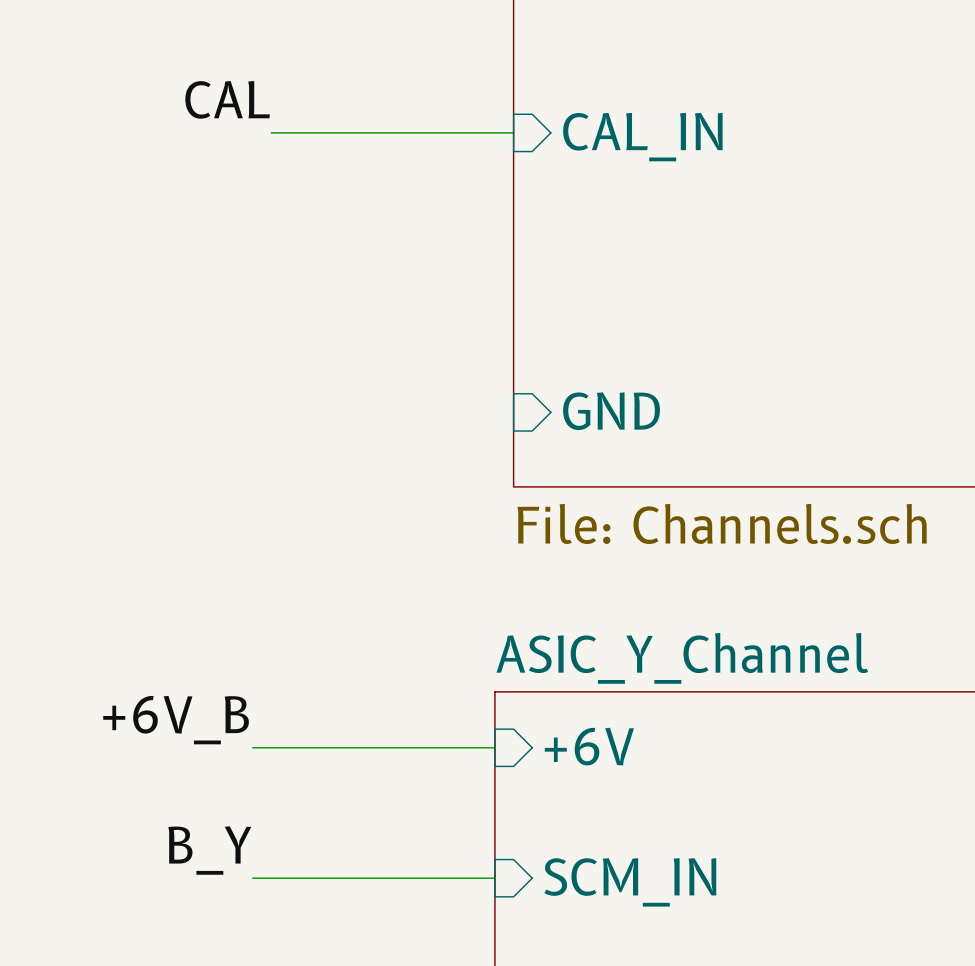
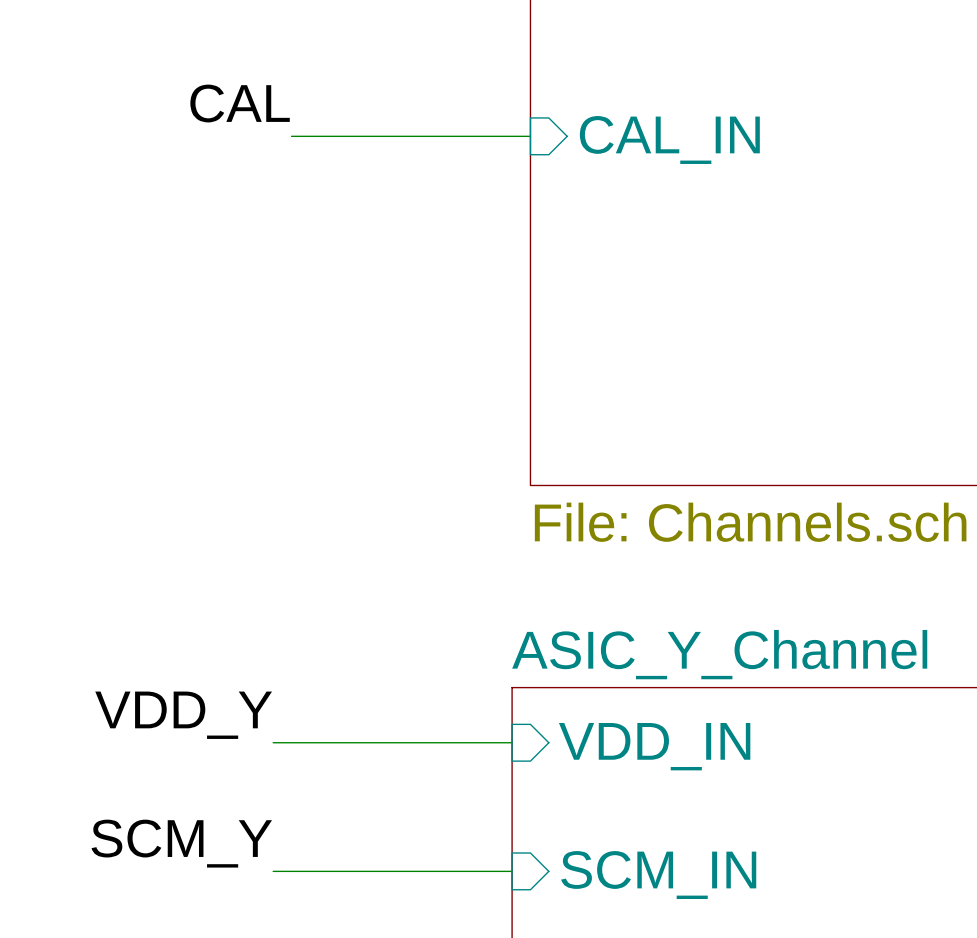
sheet pin: GND (611, 411) -> none
label: +6V_B (176, 720) -> VDD_Y (183, 715)
sheet pin: +6V (589, 746) -> VDD_IN (654, 746)
label: B_Y (209, 850) -> SCM_Y (181, 843)

